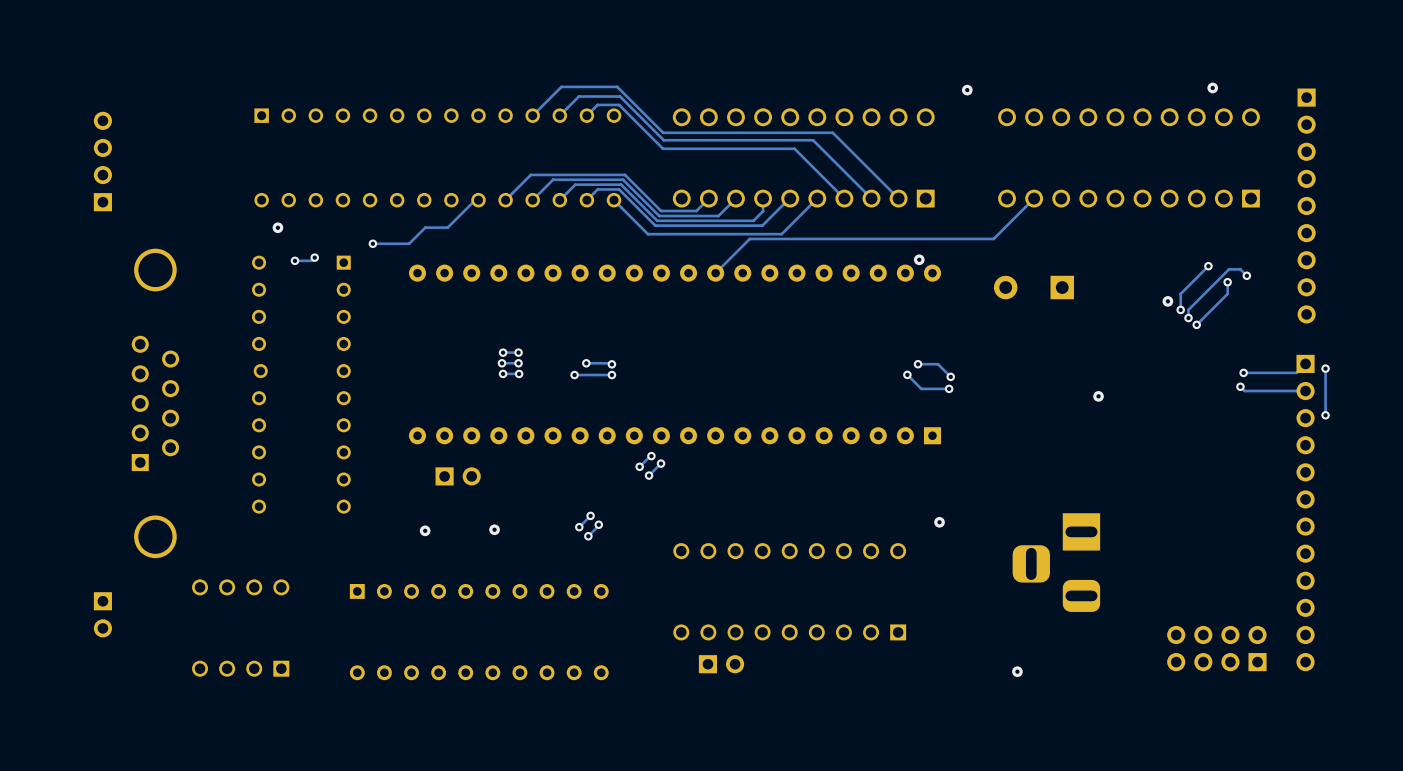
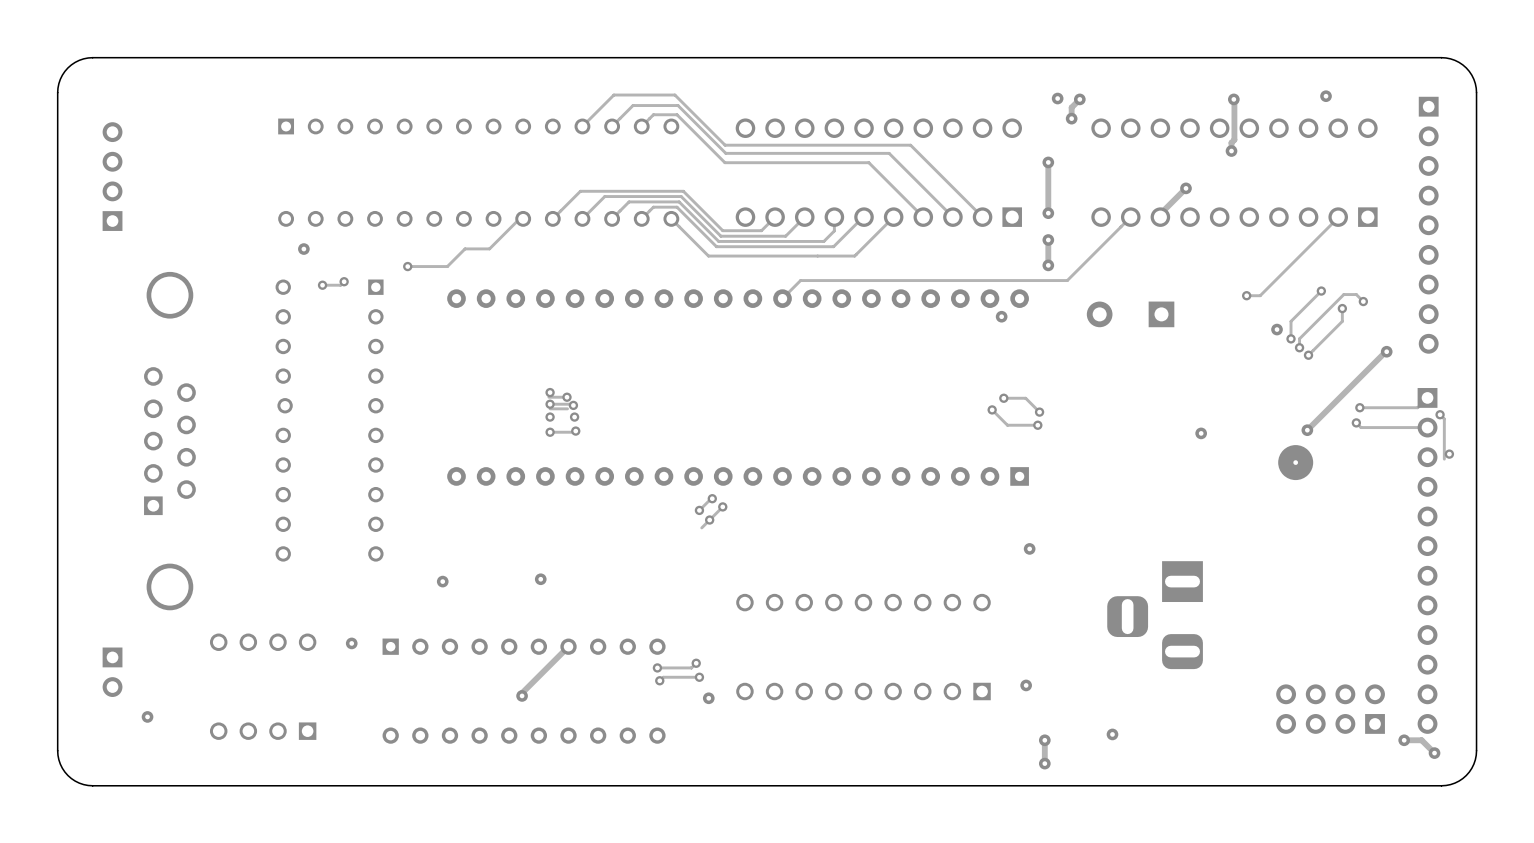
board edge: none -> (1441, 57) (92, 57) (75, 62) (62, 75) (57, 92) (57, 750) (62, 768) (75, 781) (92, 785) (1441, 785) (1459, 781) (1471, 768) (1476, 750) (1476, 92) (1473, 79) (1466, 67) (1454, 60) (1441, 57)
track: none -> (1079, 99) (1071, 107) (1071, 118)
via: none -> (1079, 99)
track: none -> (1233, 99) (1234, 139) (1231, 142) (1231, 151)
via: none -> (1233, 99)
via: none -> (1071, 118)
via: none -> (1231, 151)
track: none -> (1048, 162) (1048, 213)
via: none -> (1048, 162)
track: none -> (1186, 188) (1160, 213) (1160, 217)
via: none -> (1186, 188)
via: none -> (1048, 213)
track: none -> (1338, 217) (1260, 295) (1246, 295)
track: none -> (1048, 240) (1048, 265)
via: none -> (1048, 240)
track: (993, 238) (749, 238) (732, 256) -> (1086, 261) (1067, 280) (800, 280)
via: none -> (1048, 265)
via: (919, 259) -> none
via: none -> (1246, 295)
via: none -> (1001, 316)
track: none -> (1386, 351) (1307, 430)
via: none -> (1386, 351)
via: (503, 352) -> none
track: (518, 352) (503, 352) -> none
via: (518, 352) -> none
via: none -> (550, 392)
via: (502, 363) -> none
track: (586, 363) (611, 364) -> none
via: (586, 363) -> none
via: (611, 364) -> none
track: (1325, 368) (1325, 415) -> none
via position: (1325, 368) -> (1440, 414)
track: none -> (550, 404) (573, 405)
via: none -> (550, 404)
via: none -> (573, 405)
via: (503, 373) -> none
via: (519, 373) -> none
via: (574, 375) -> none
track: (611, 375) (574, 375) -> none
via: (611, 375) -> none
track: none -> (1440, 414) (1444, 419) (1444, 459)
via: none -> (550, 417)
via: none -> (574, 417)
via: none -> (1307, 430)
track: none -> (575, 431) (550, 432)
via: none -> (575, 431)
via: none -> (550, 432)
via: none -> (1295, 462)
track: none -> (709, 520) (701, 527)
part: (458, 476) -> none
track: (590, 515) (579, 527) -> none
via: (590, 515) -> none
via position: (939, 522) -> (1029, 548)
track: (598, 524) (588, 536) -> none
via: (598, 524) -> none
via: (579, 527) -> none
via position: (425, 530) -> (442, 581)
via: (588, 536) -> none
via: none -> (351, 643)
track: none -> (567, 647) (522, 693) (522, 695)
track: none -> (696, 663) (691, 667) (657, 667)
via: none -> (696, 663)
via: none -> (657, 667)
track: none -> (699, 677) (663, 677) (659, 680)
via: none -> (699, 677)
via: none -> (659, 680)
via: none -> (1026, 685)
via: none -> (522, 695)
via: none -> (708, 698)
via: none -> (147, 716)
part: (721, 664) -> none
track: none -> (1044, 740) (1044, 763)
via: none -> (1044, 740)
track: none -> (1404, 740) (1421, 740) (1434, 753)
via: none -> (1404, 740)
via: none -> (1434, 753)
via: none -> (1044, 763)

